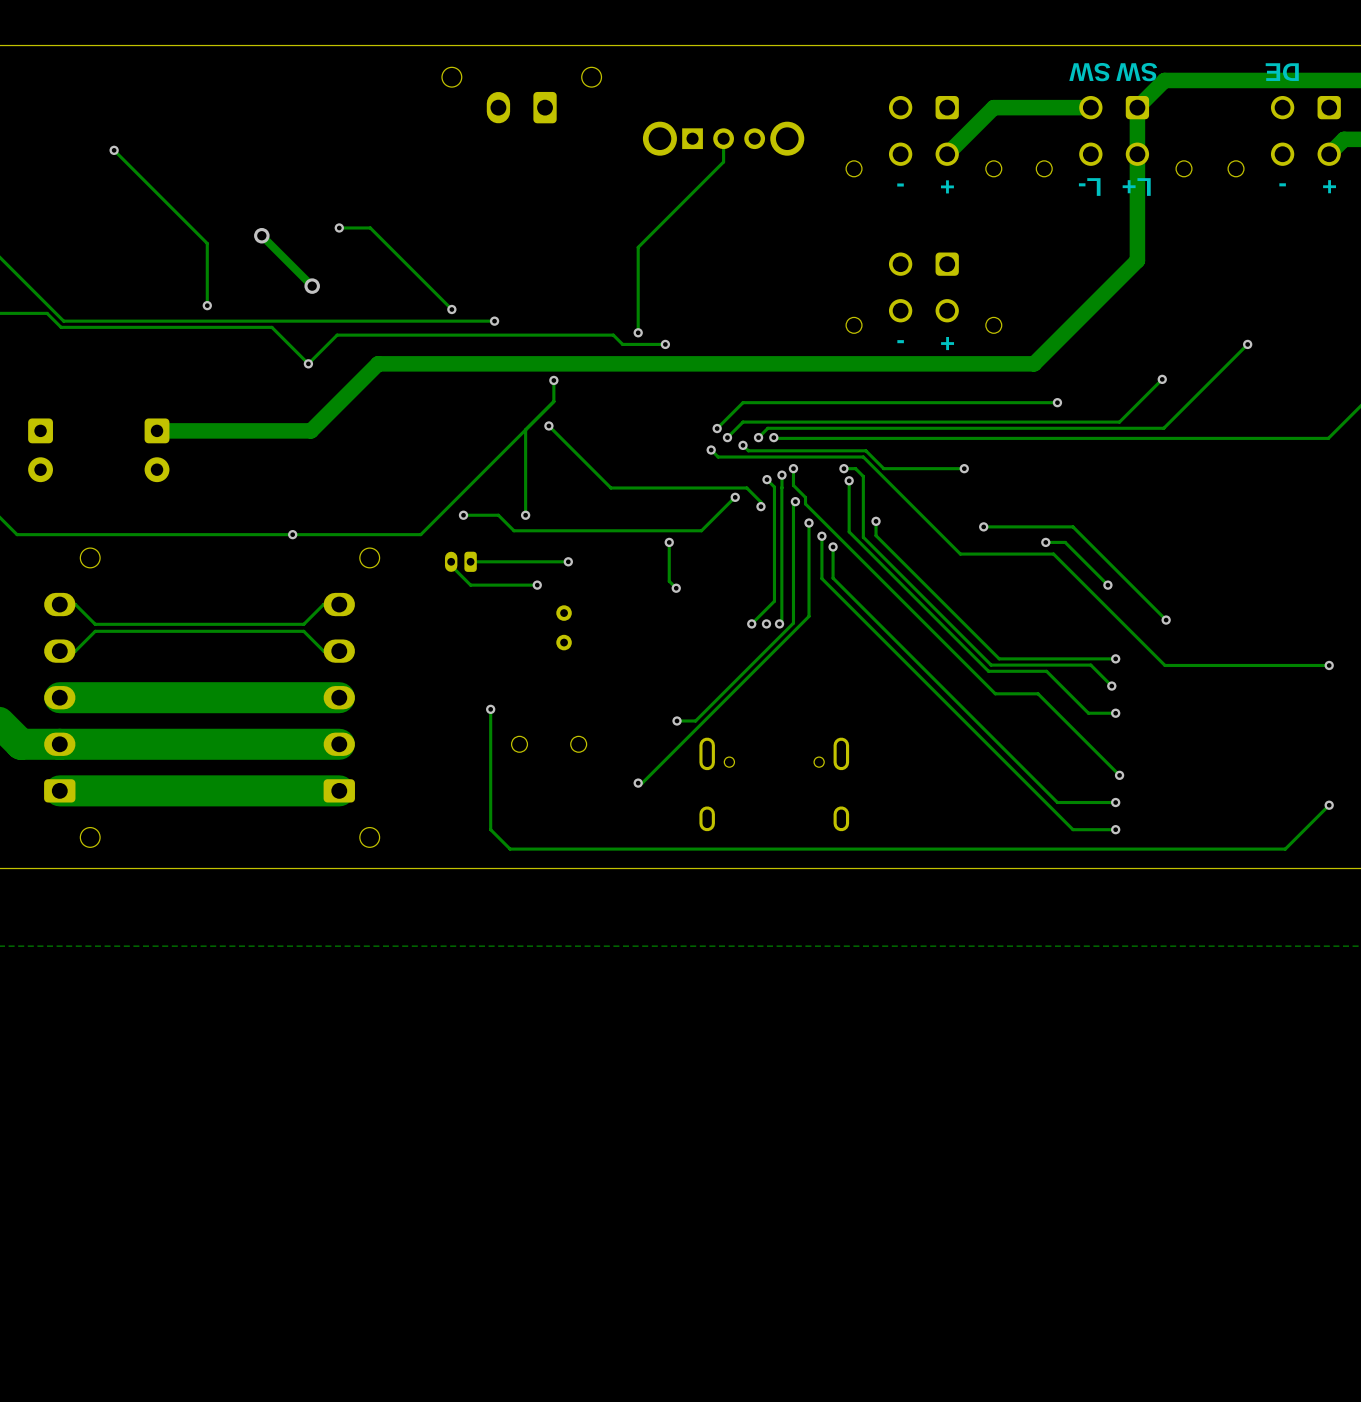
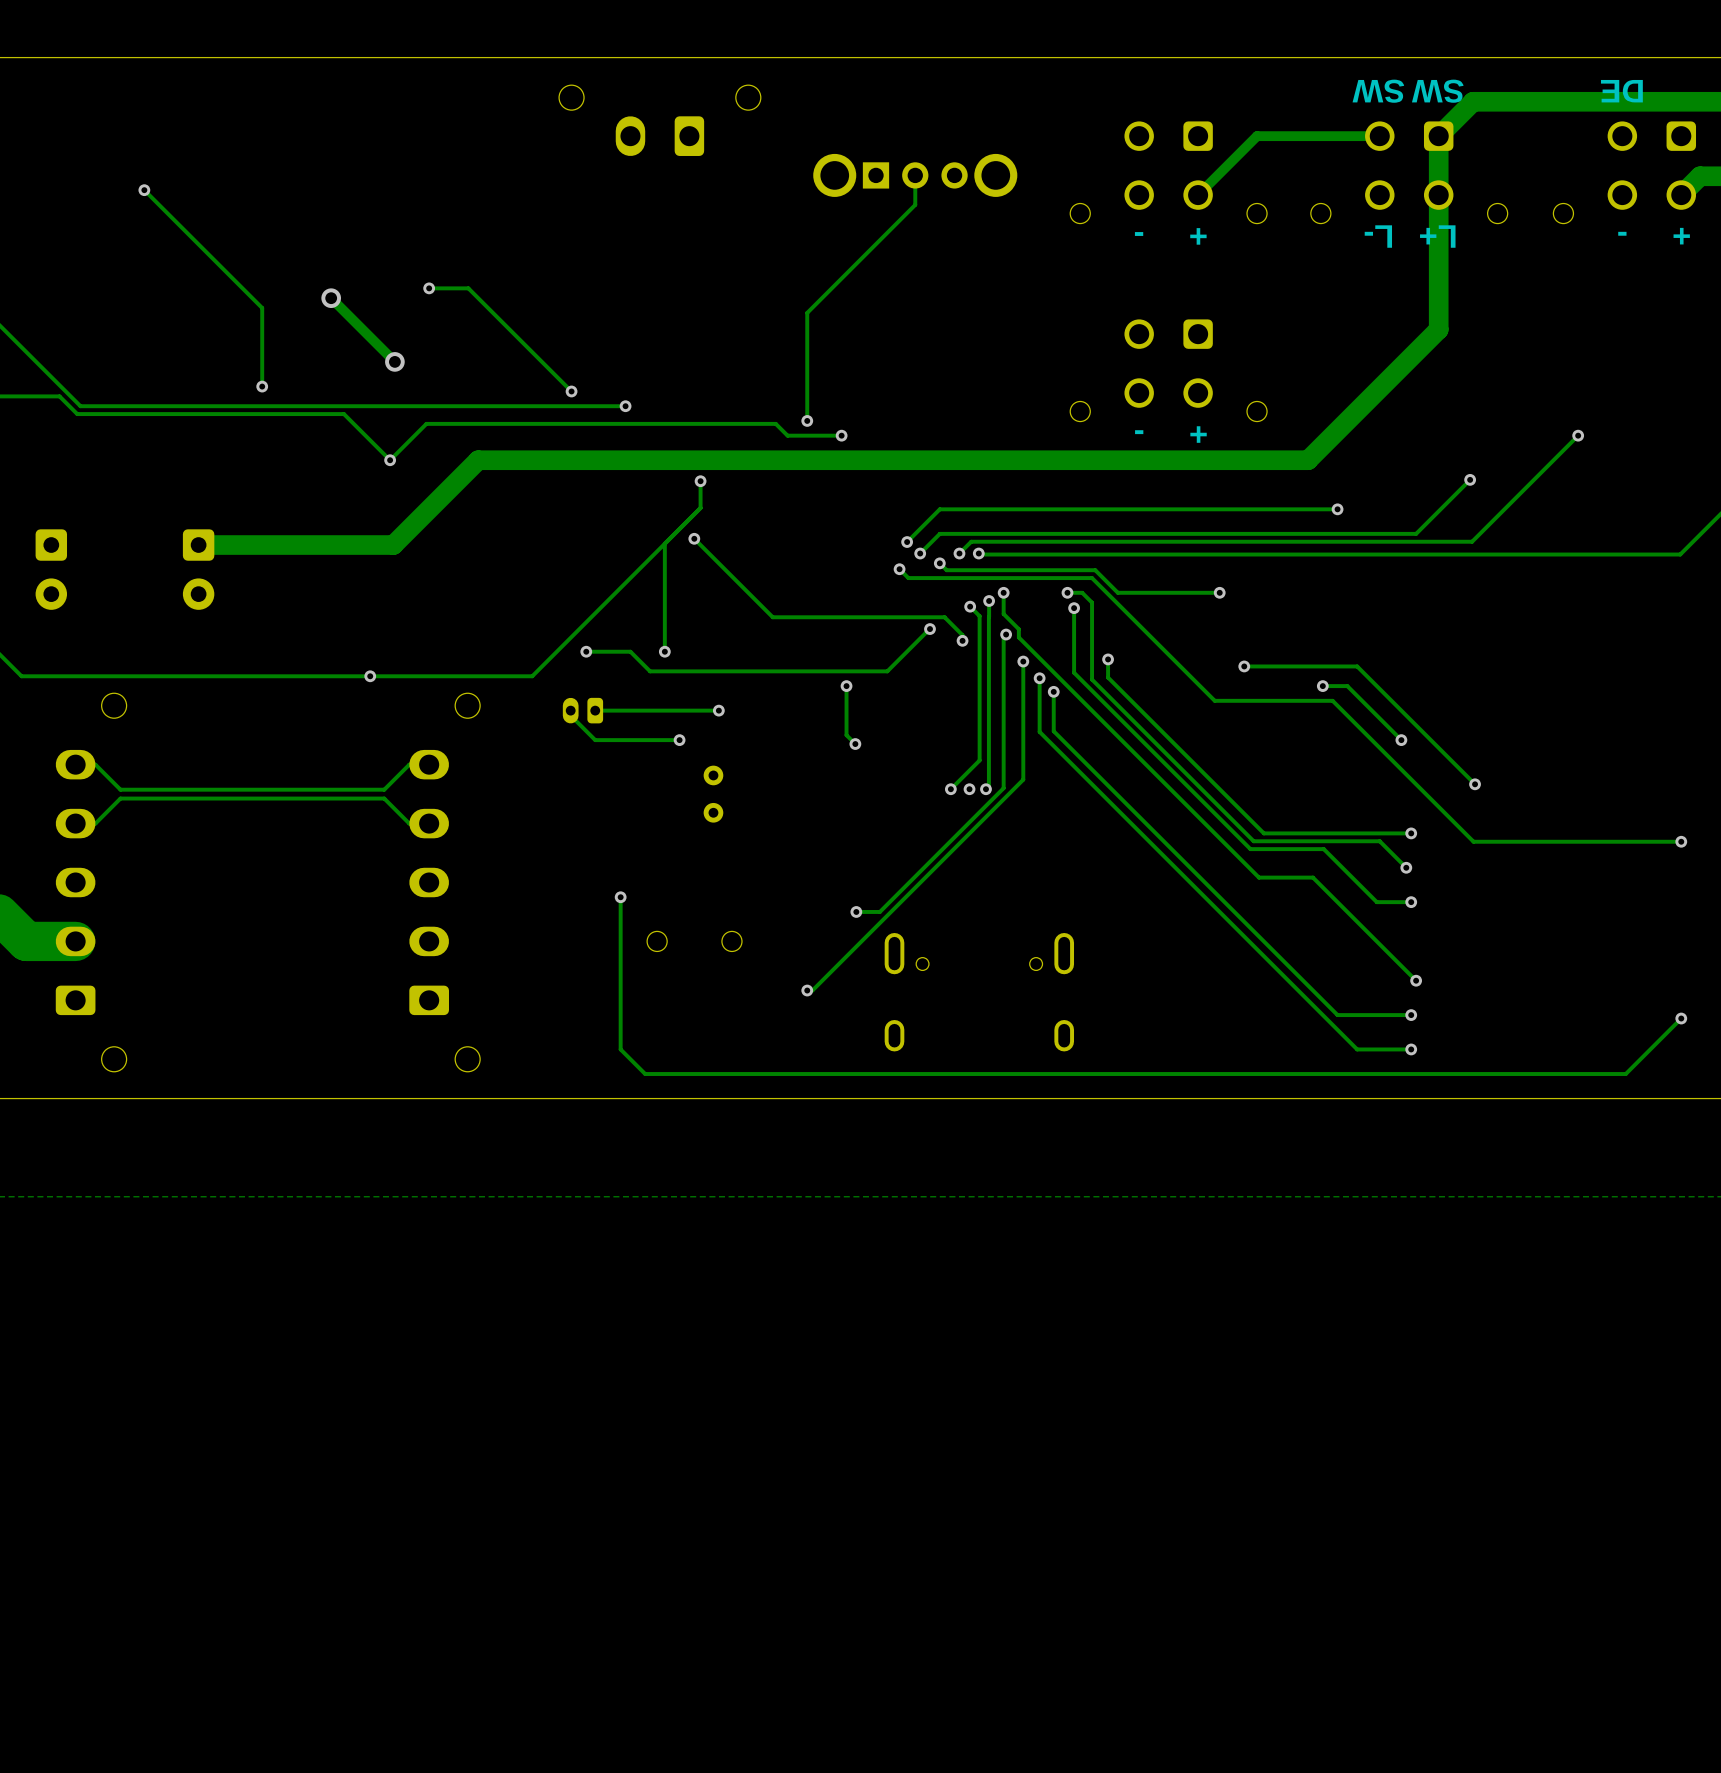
track width: thick (1090, 107) (993, 107) (947, 154) -> thin (1379, 136) (1257, 136) (1198, 195)
track: (339, 697) (59, 697) -> none
track: (339, 744) (59, 744) -> none
track: (339, 790) (59, 790) -> none

